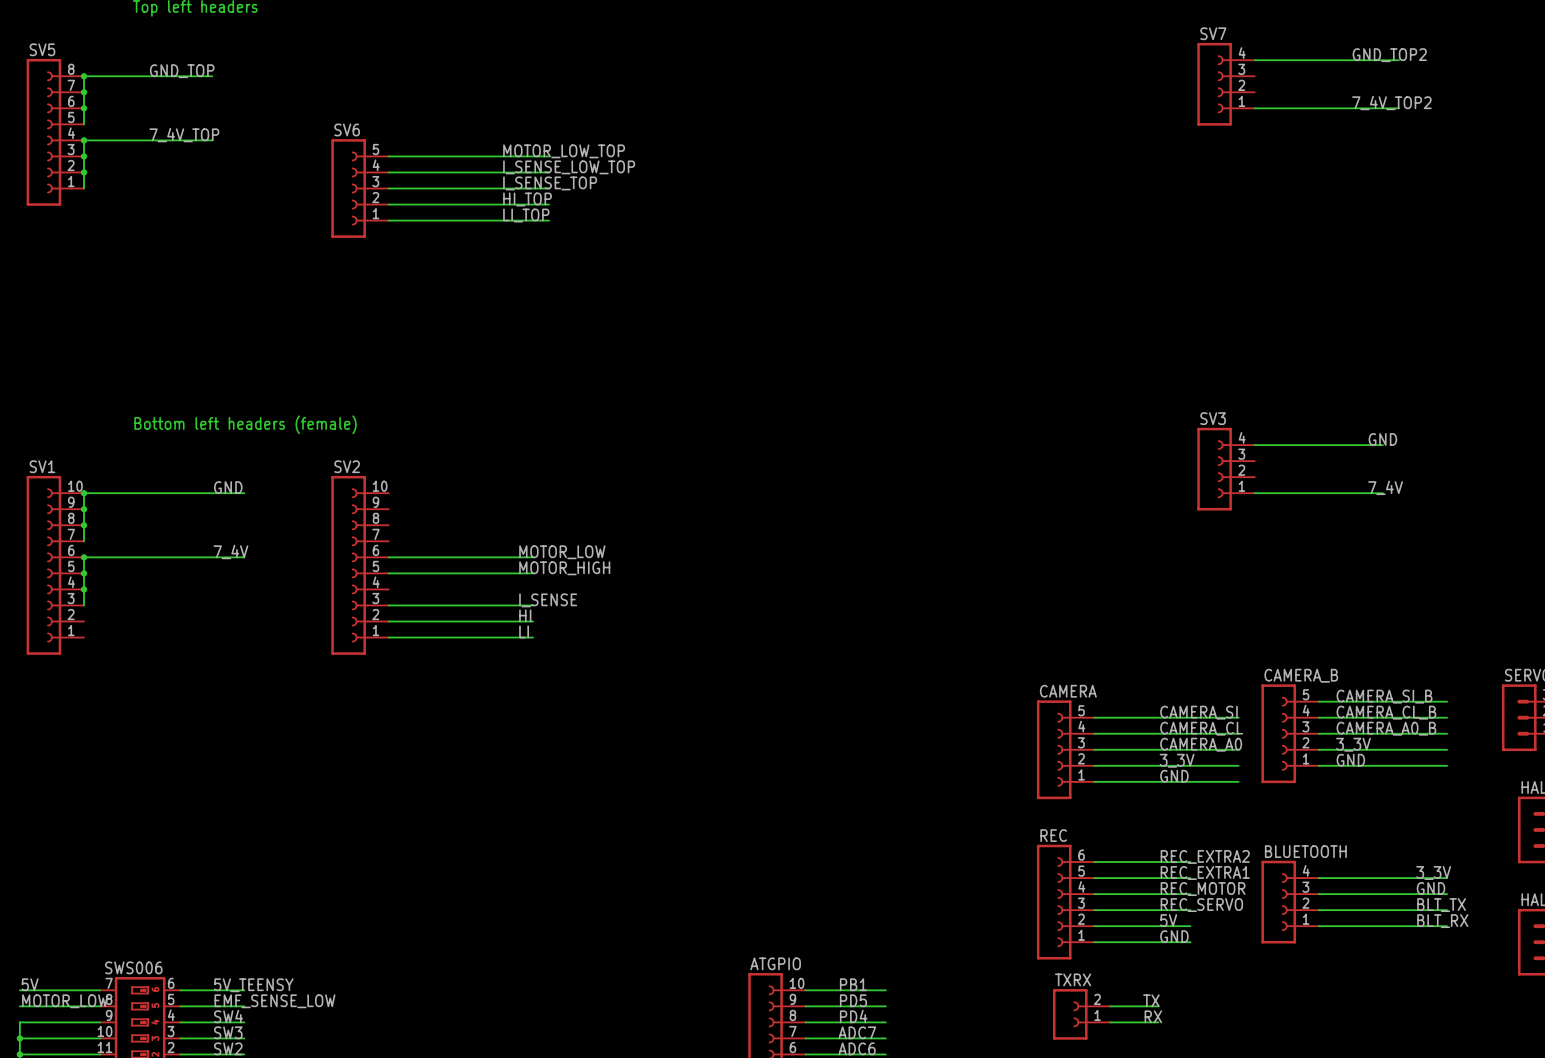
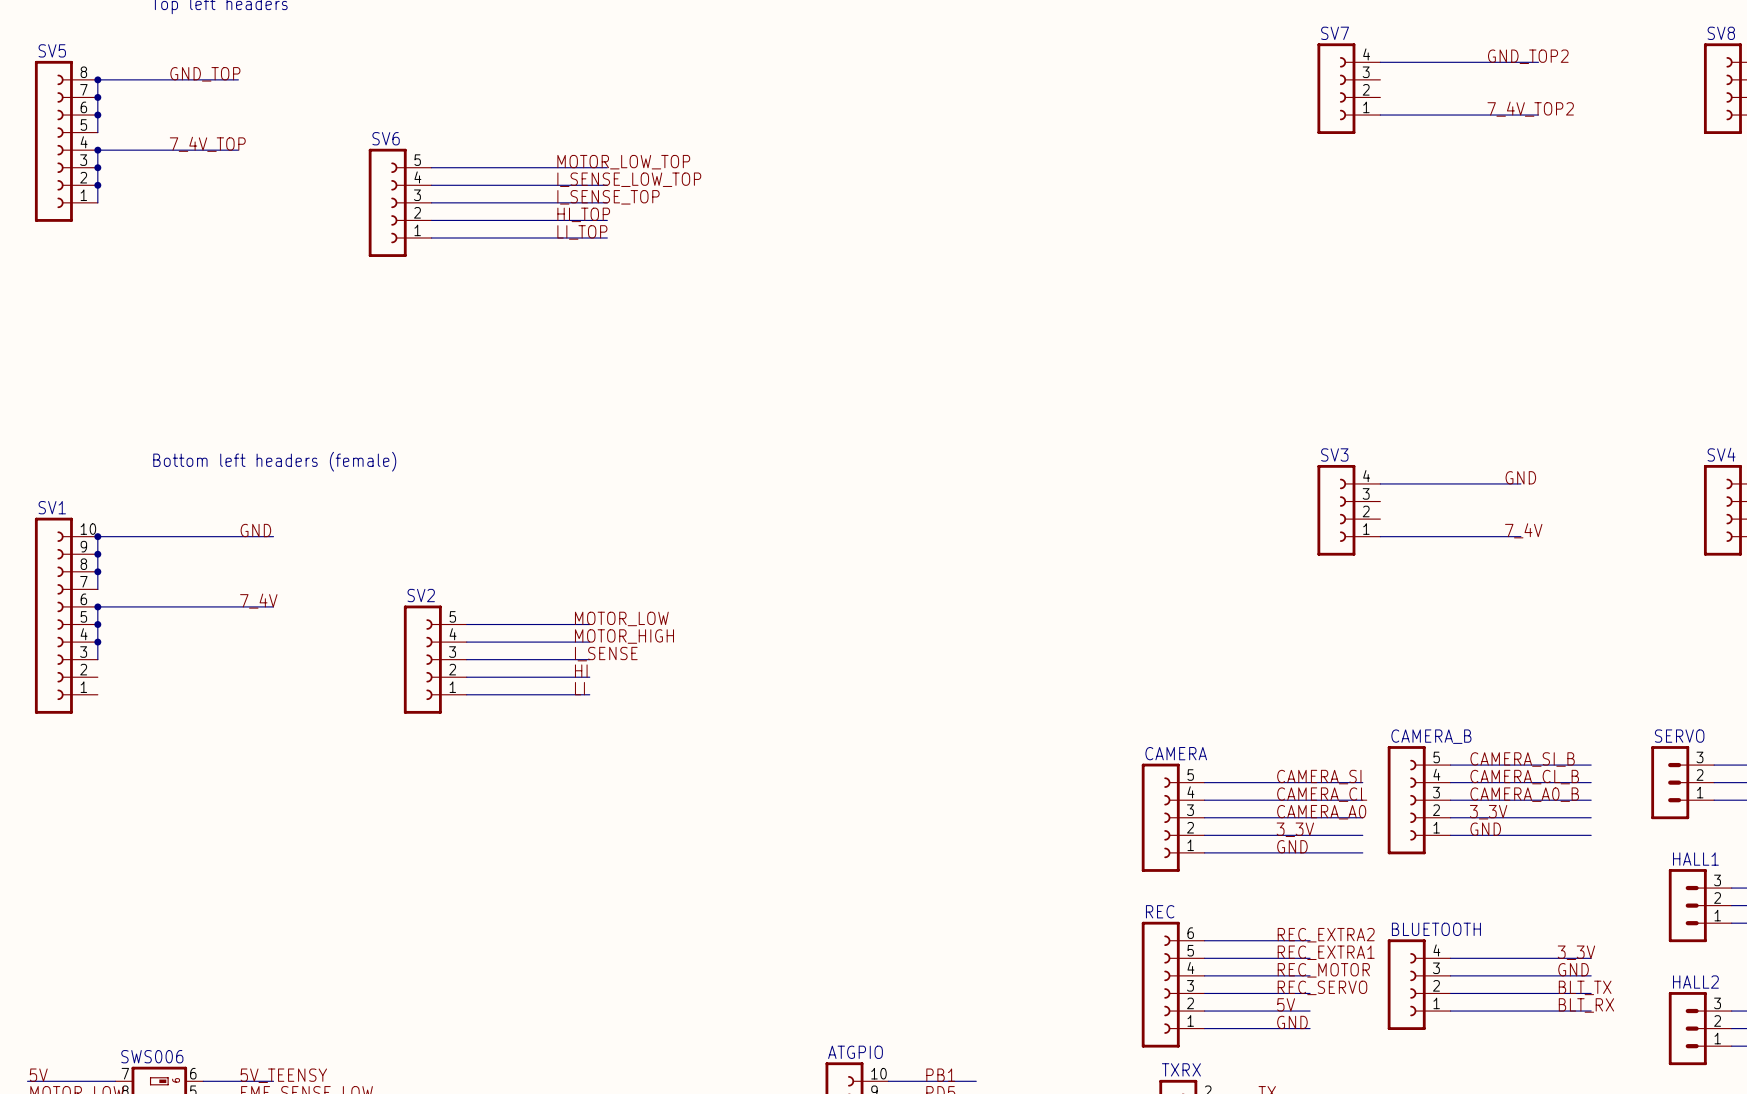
SV2 name position: SV2 (347, 466) -> SV2 (421, 595)
SV2 symbol: [331, 475, 389, 655] -> [403, 605, 467, 714]
label: MOTOR_LOW (562, 552) -> none
wire: (388, 557) (533, 557) -> none
label: MOTOR_HIGH (564, 568) -> MOTOR_LOW (621, 618)
label: none -> MOTOR_HIGH (624, 636)
wire: none -> (466, 642) (589, 642)

